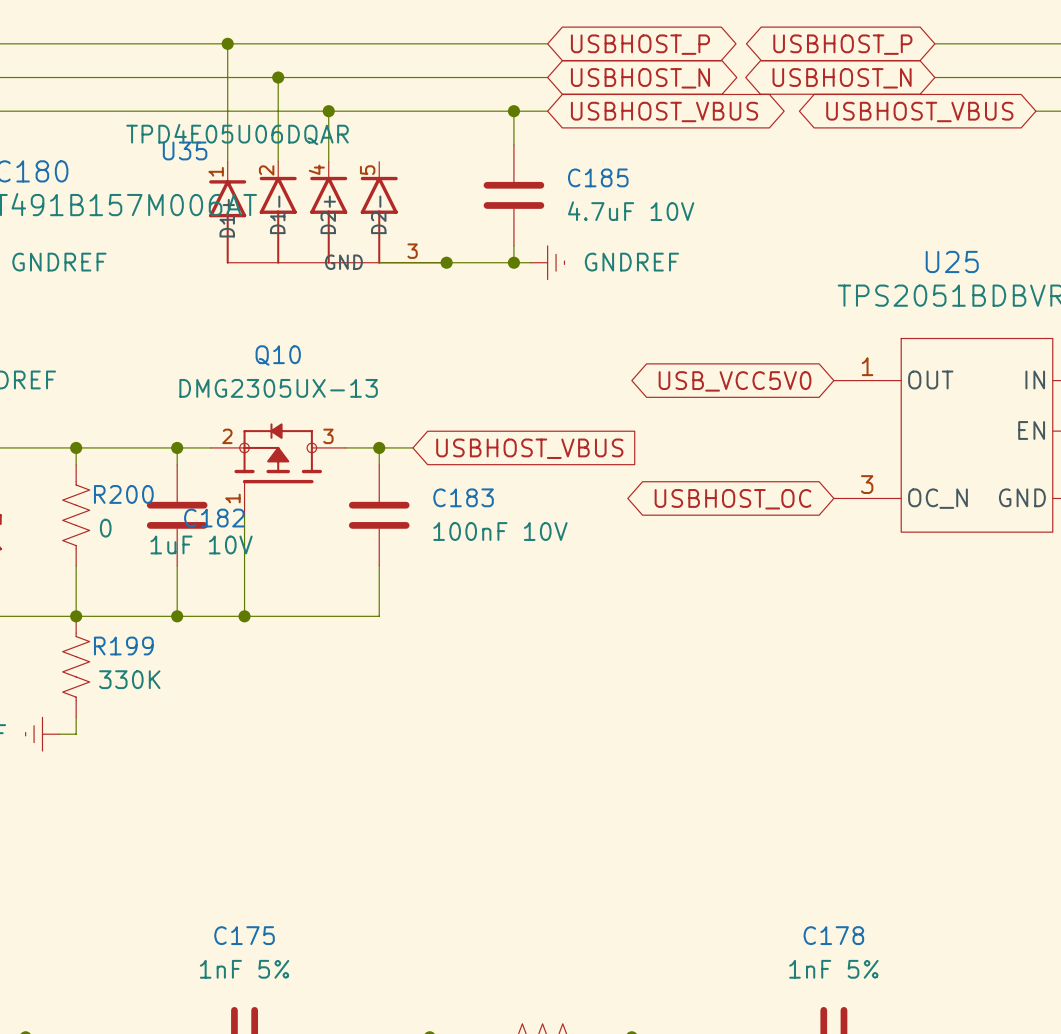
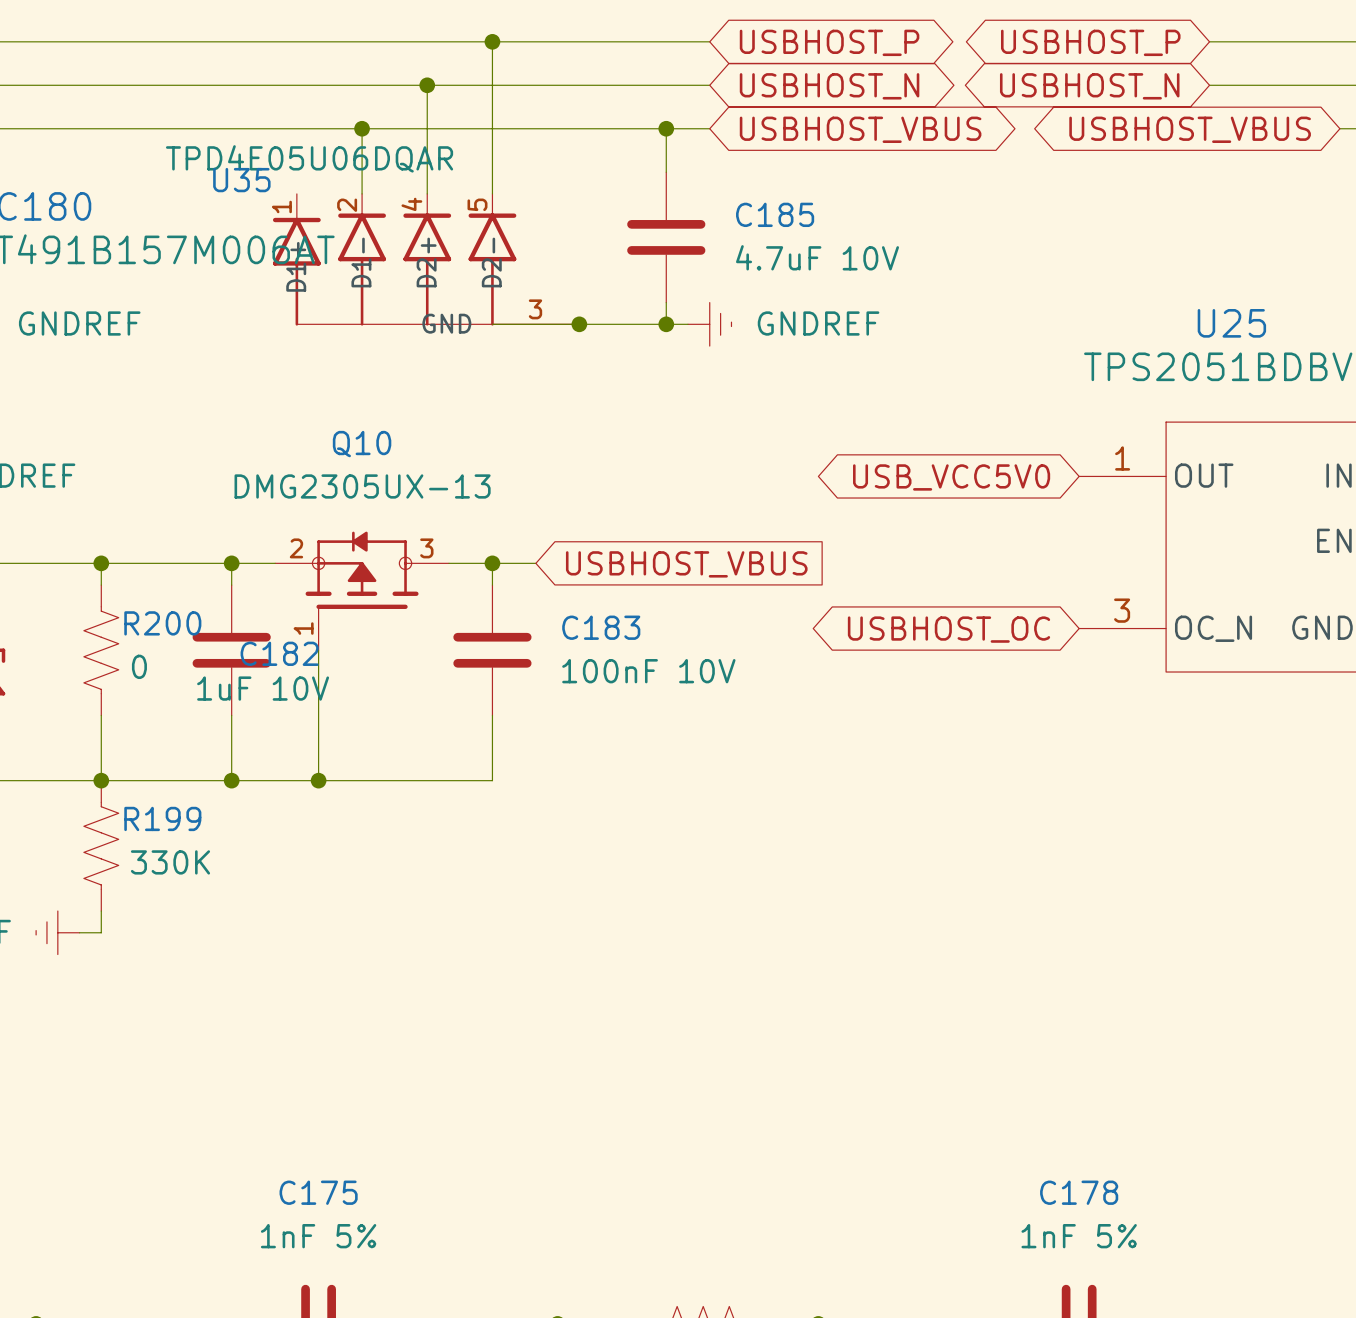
wire: (227, 43) (227, 161) -> (492, 41) (492, 193)
junction: (227, 43) -> none
junction: none -> (492, 41)
wire: (278, 77) (278, 111) -> (427, 85) (427, 128)
junction: (278, 77) -> none
junction: none -> (427, 85)
junction: none -> (362, 128)
junction: (328, 111) -> none

